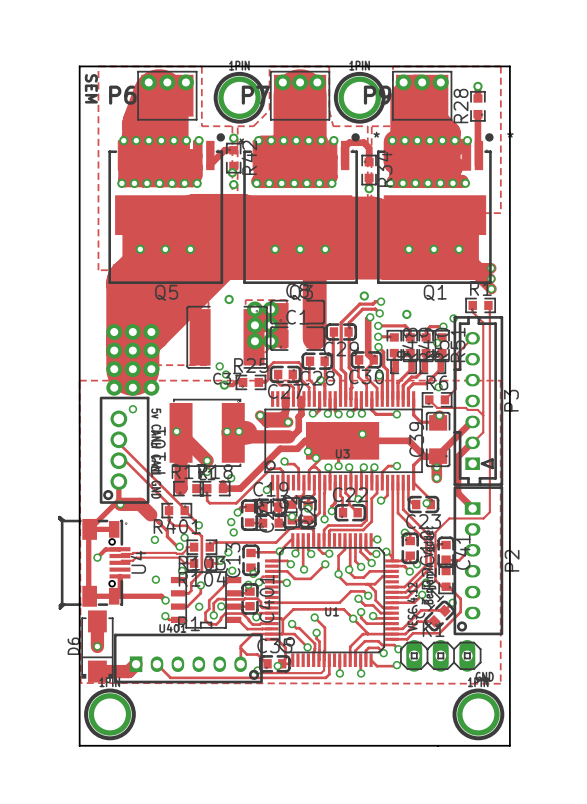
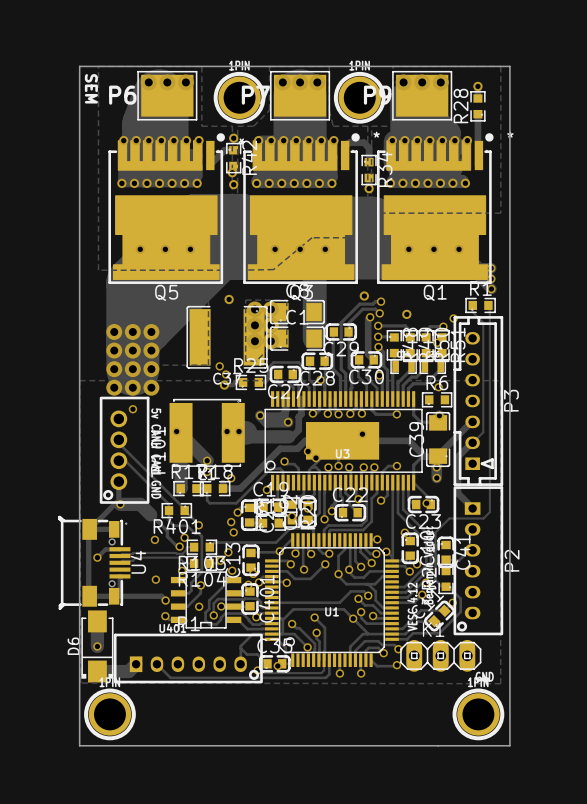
track: (472, 338) (455, 355) (455, 388) (444, 399) -> none
track: (429, 399) (437, 407) (465, 407) (467, 409) (477, 409) (483, 415) -> none

